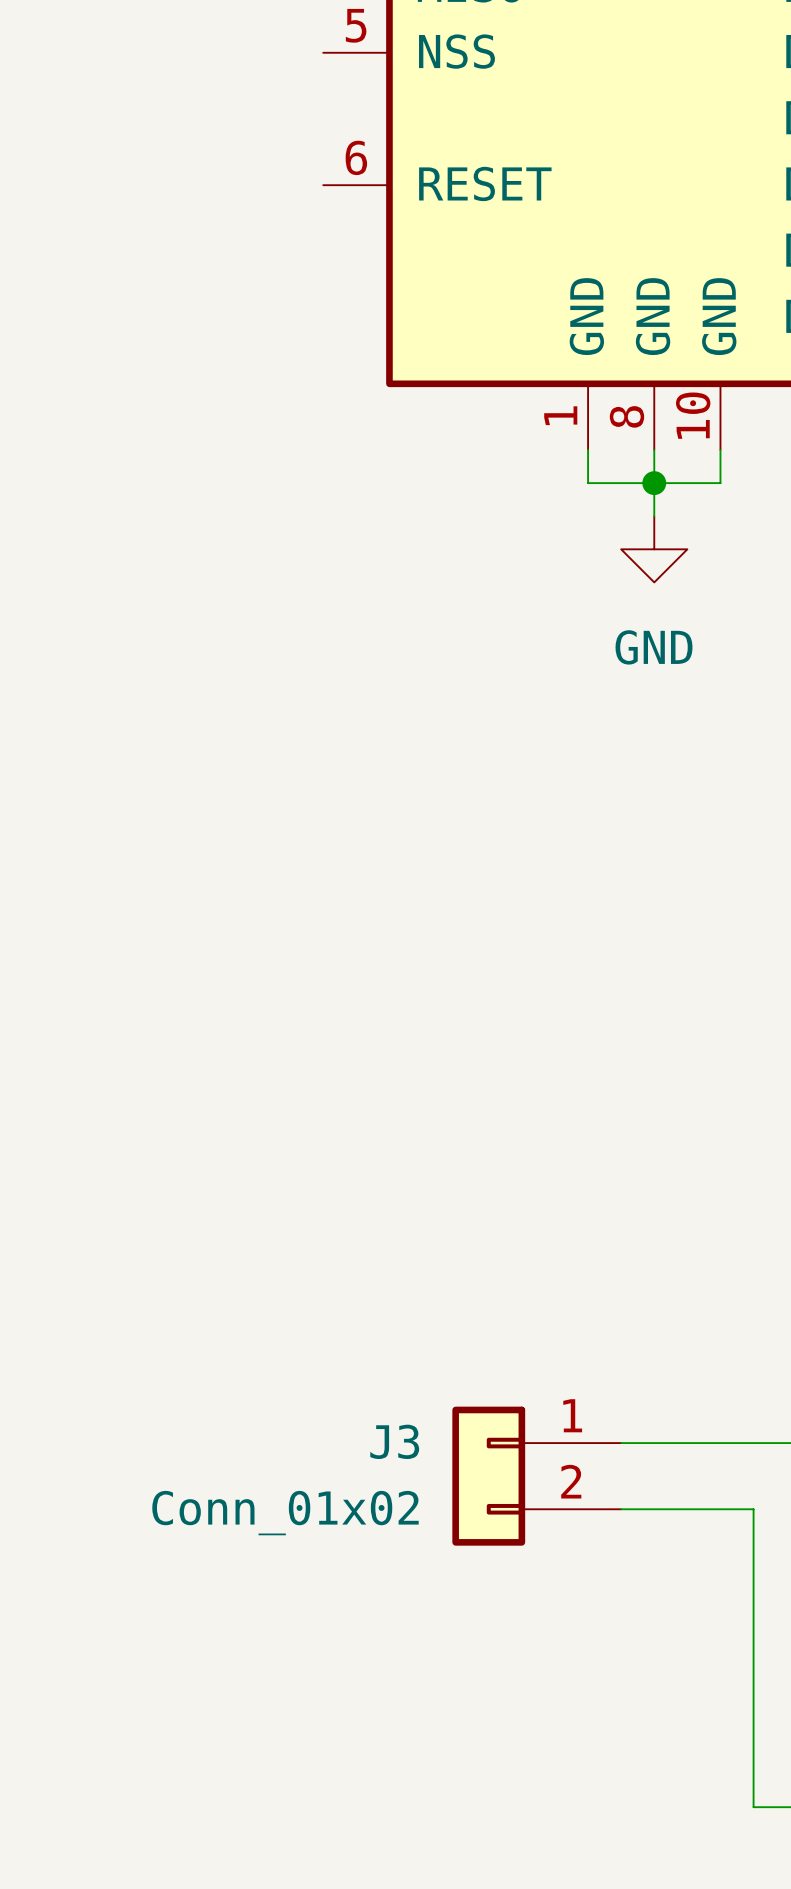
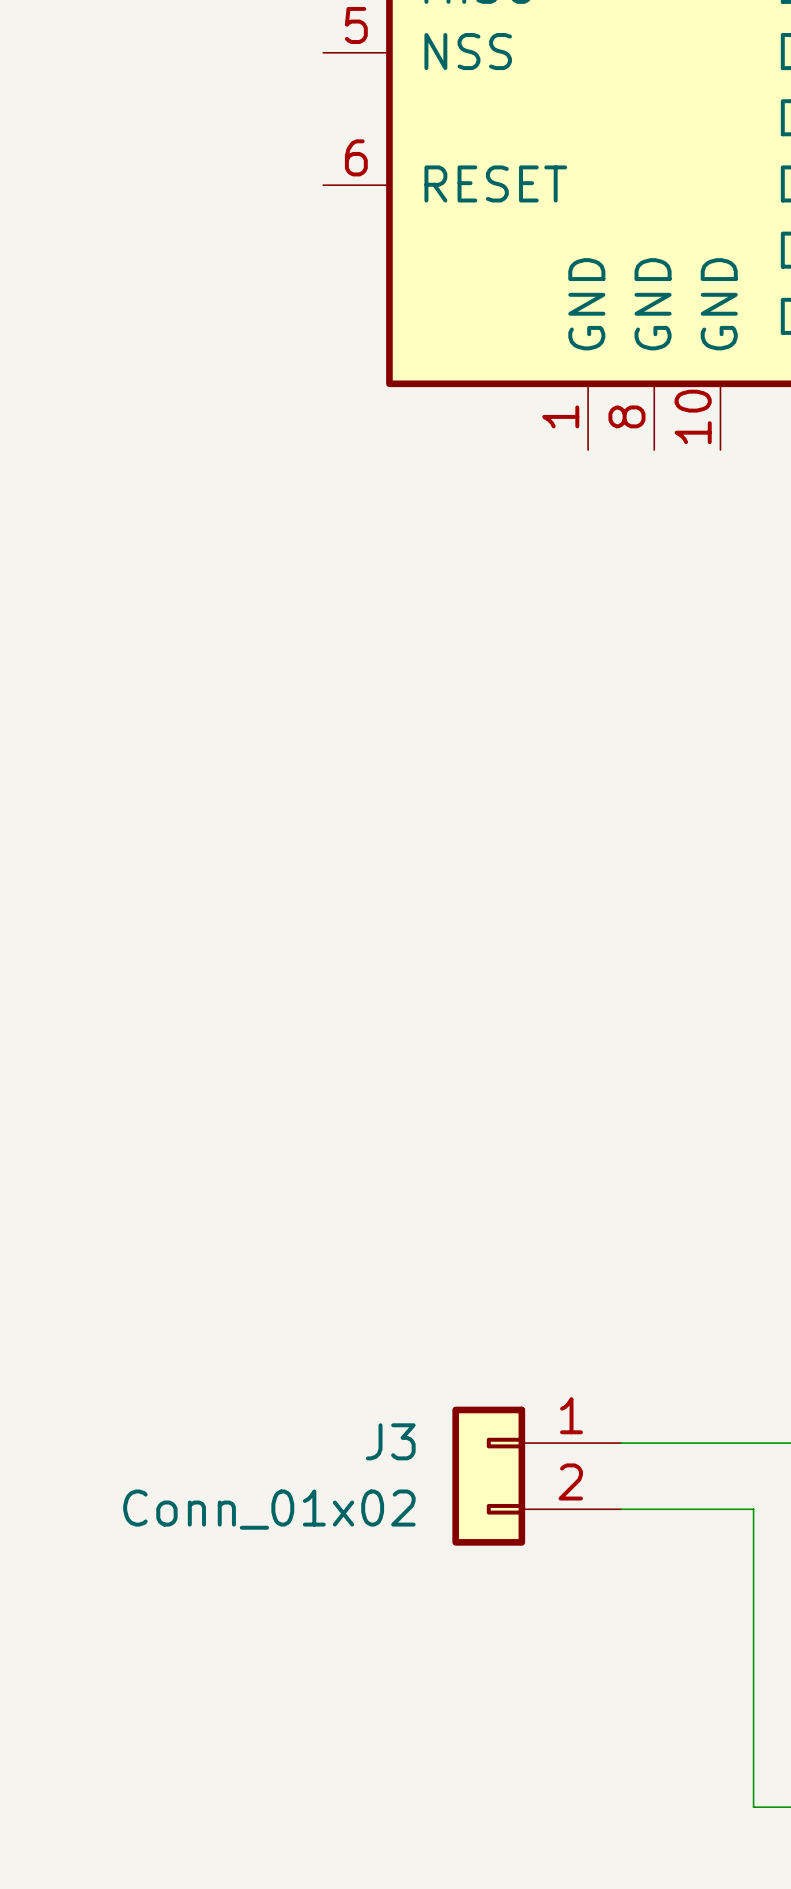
wire: (588, 450) (588, 483) (720, 483) (720, 450) -> none
wire: (654, 450) (654, 516) -> none
junction: (654, 483) -> none
power symbol: GND (654, 549) -> none

